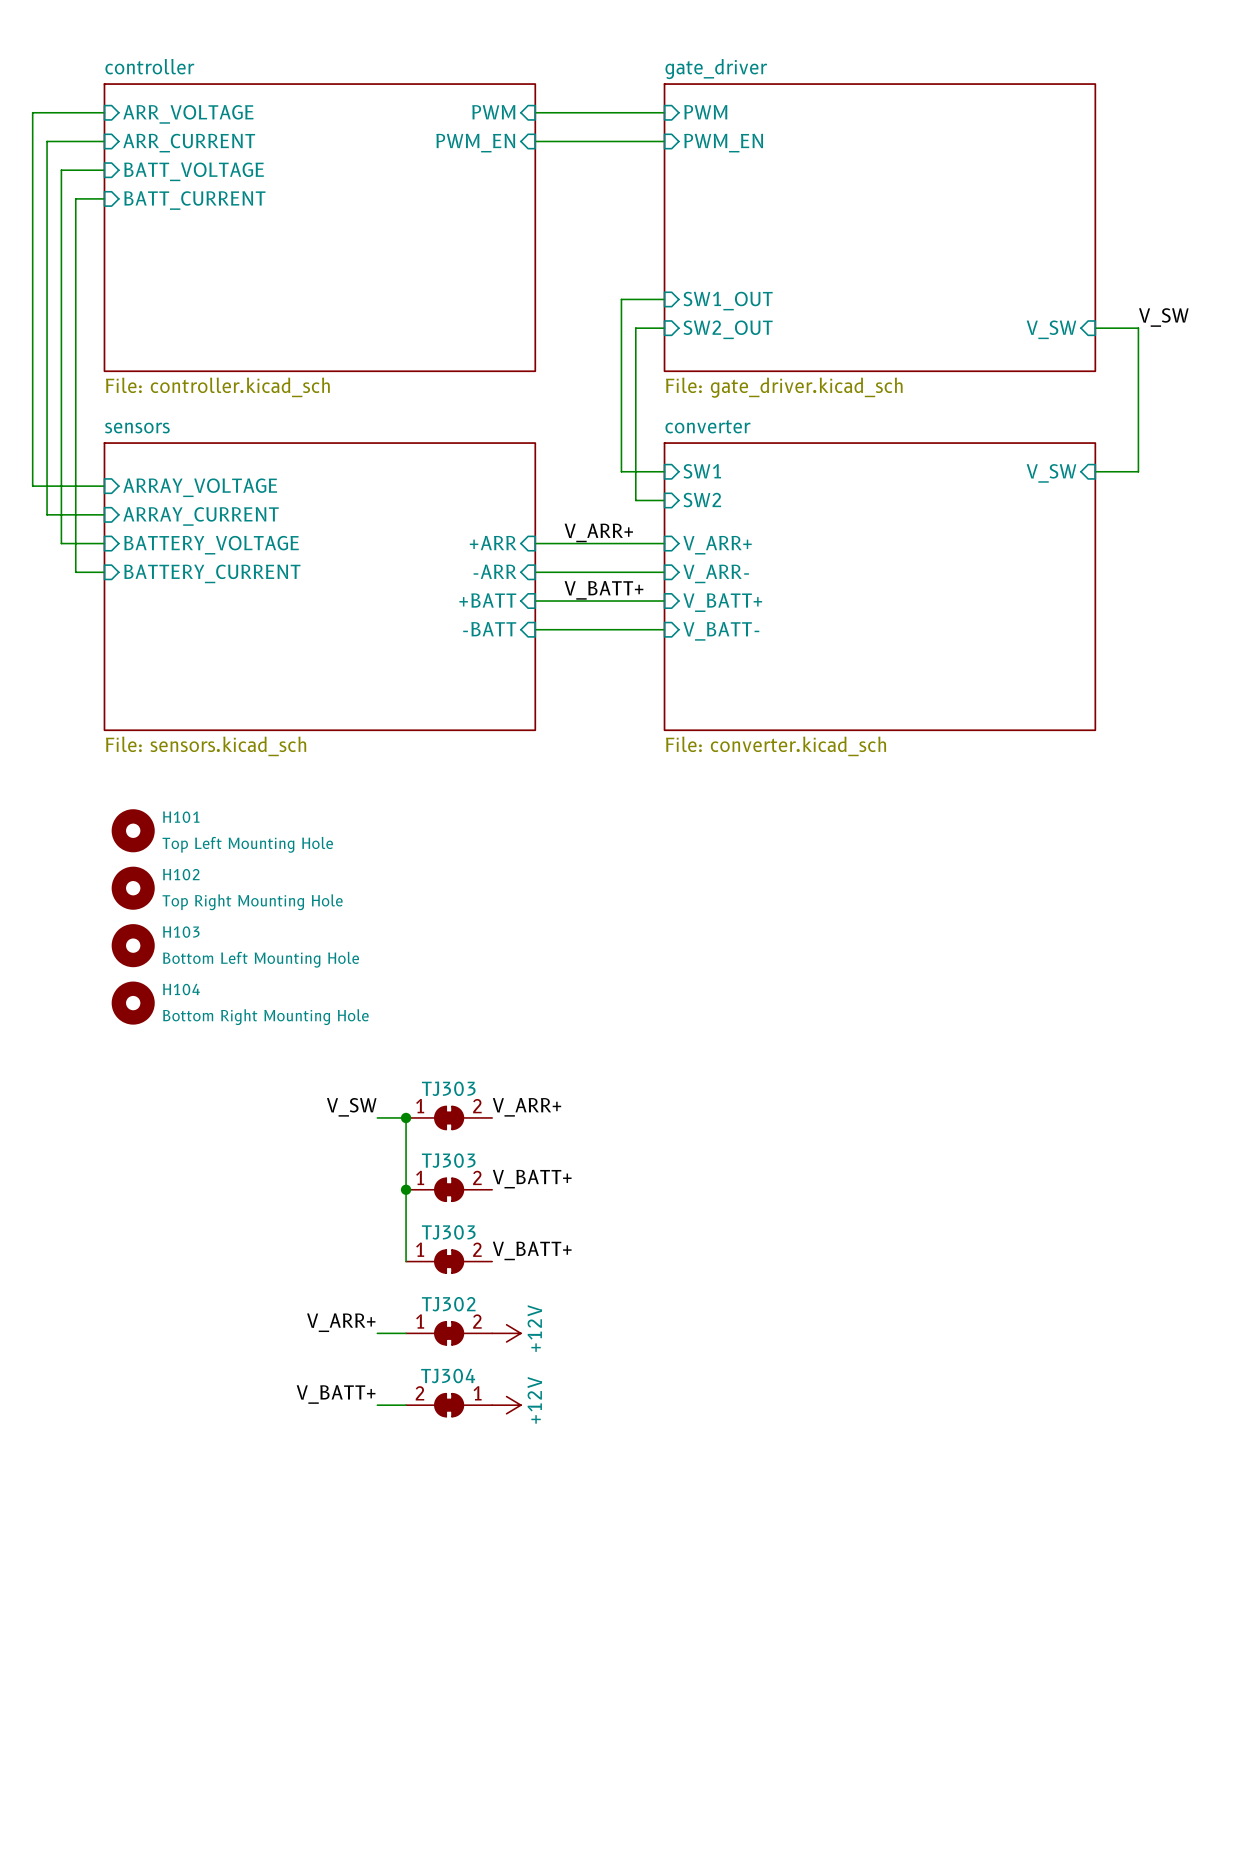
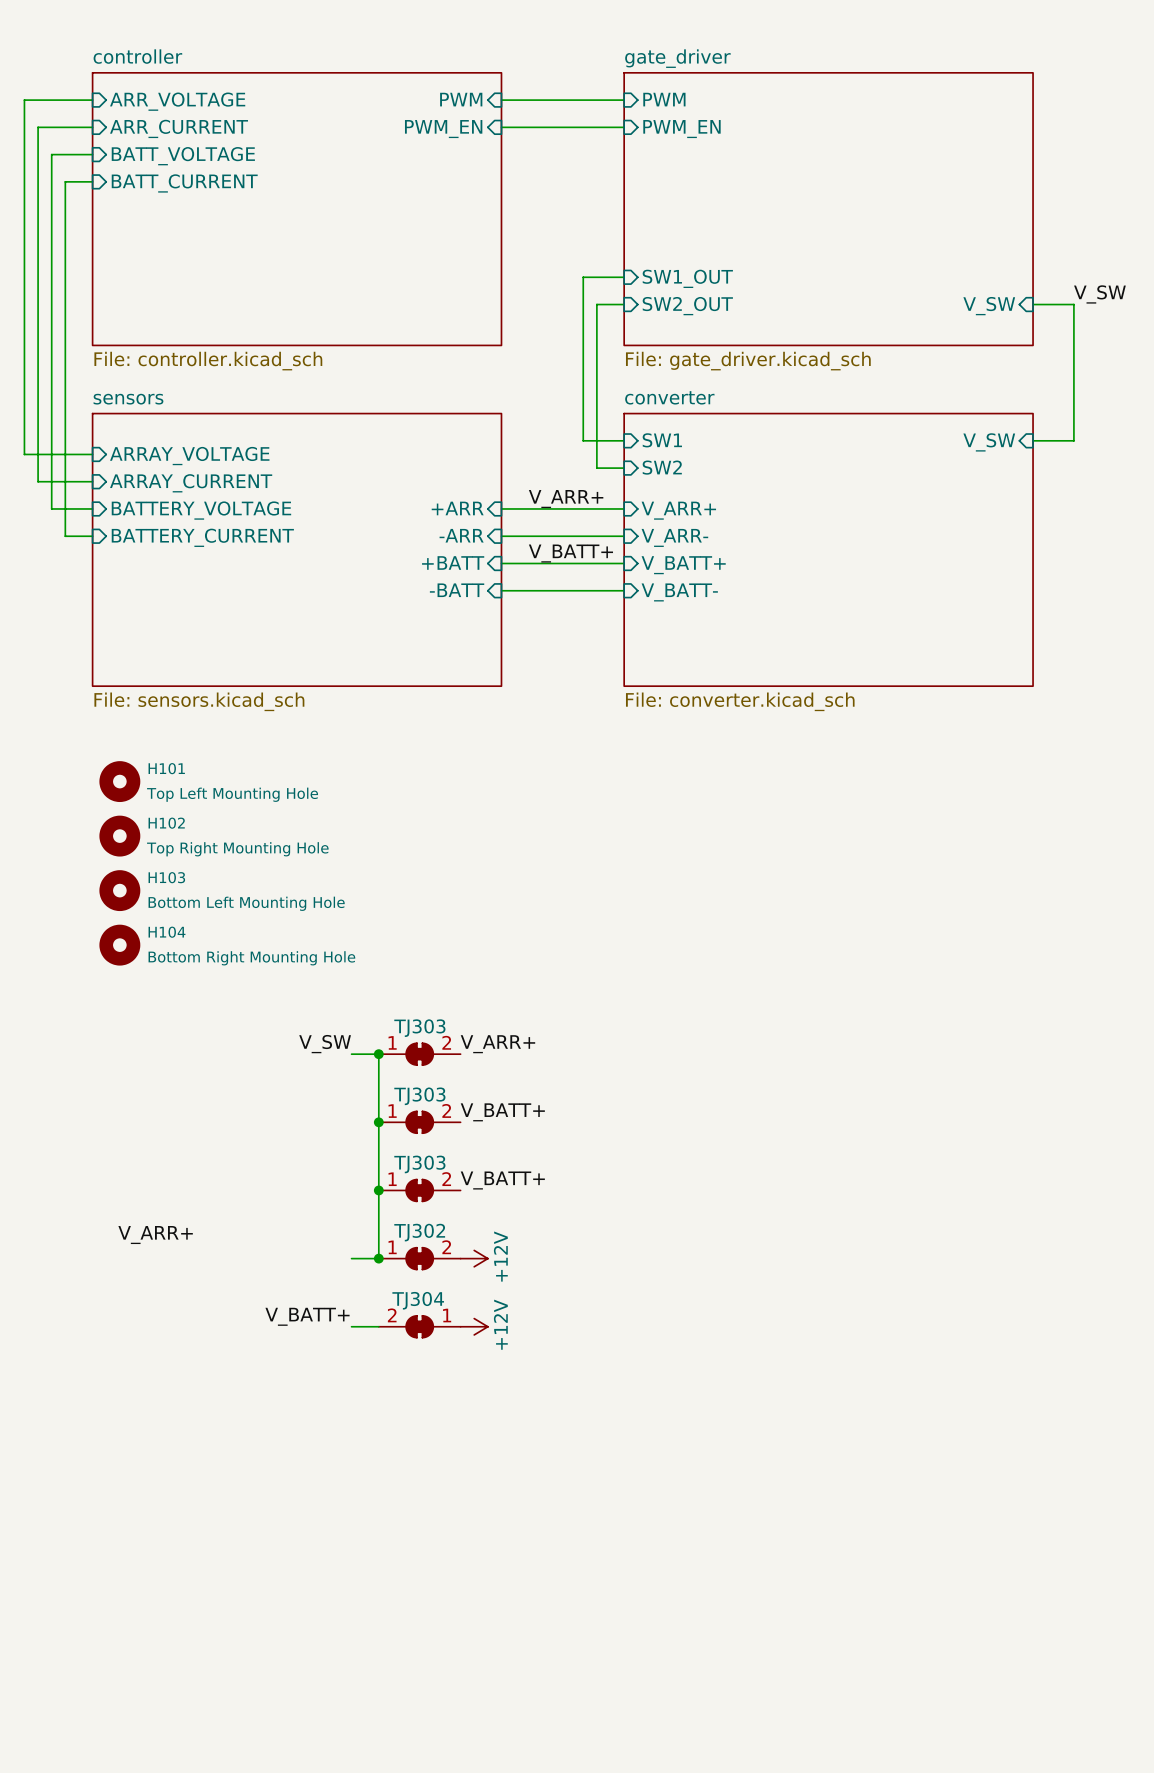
wire: none -> (378, 1190) (378, 1258)
junction: none -> (378, 1190)
label position: V_ARR+ (341, 1322) -> V_ARR+ (155, 1235)
junction: none -> (378, 1258)

